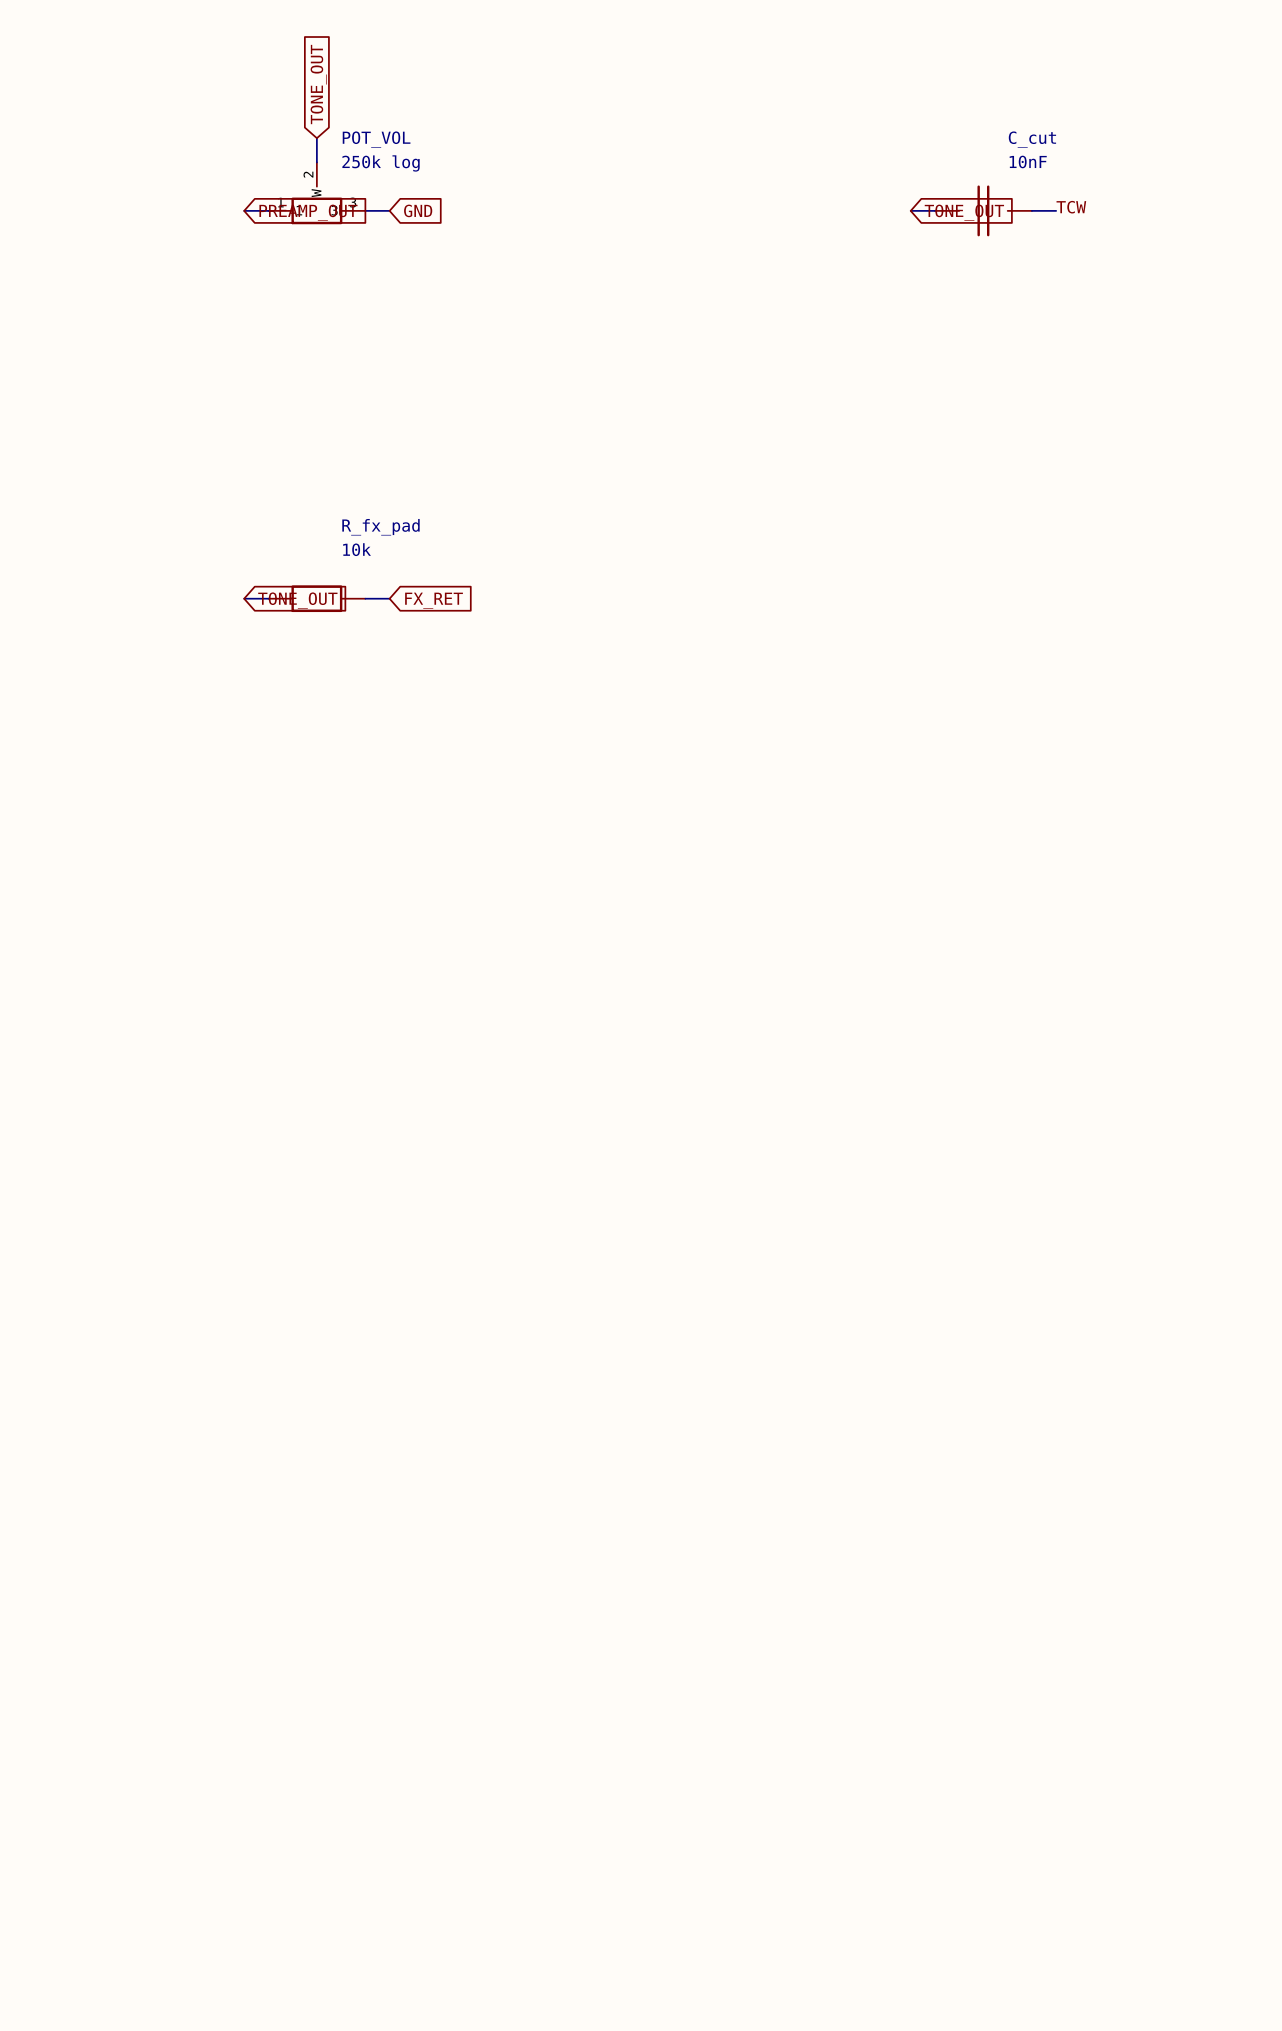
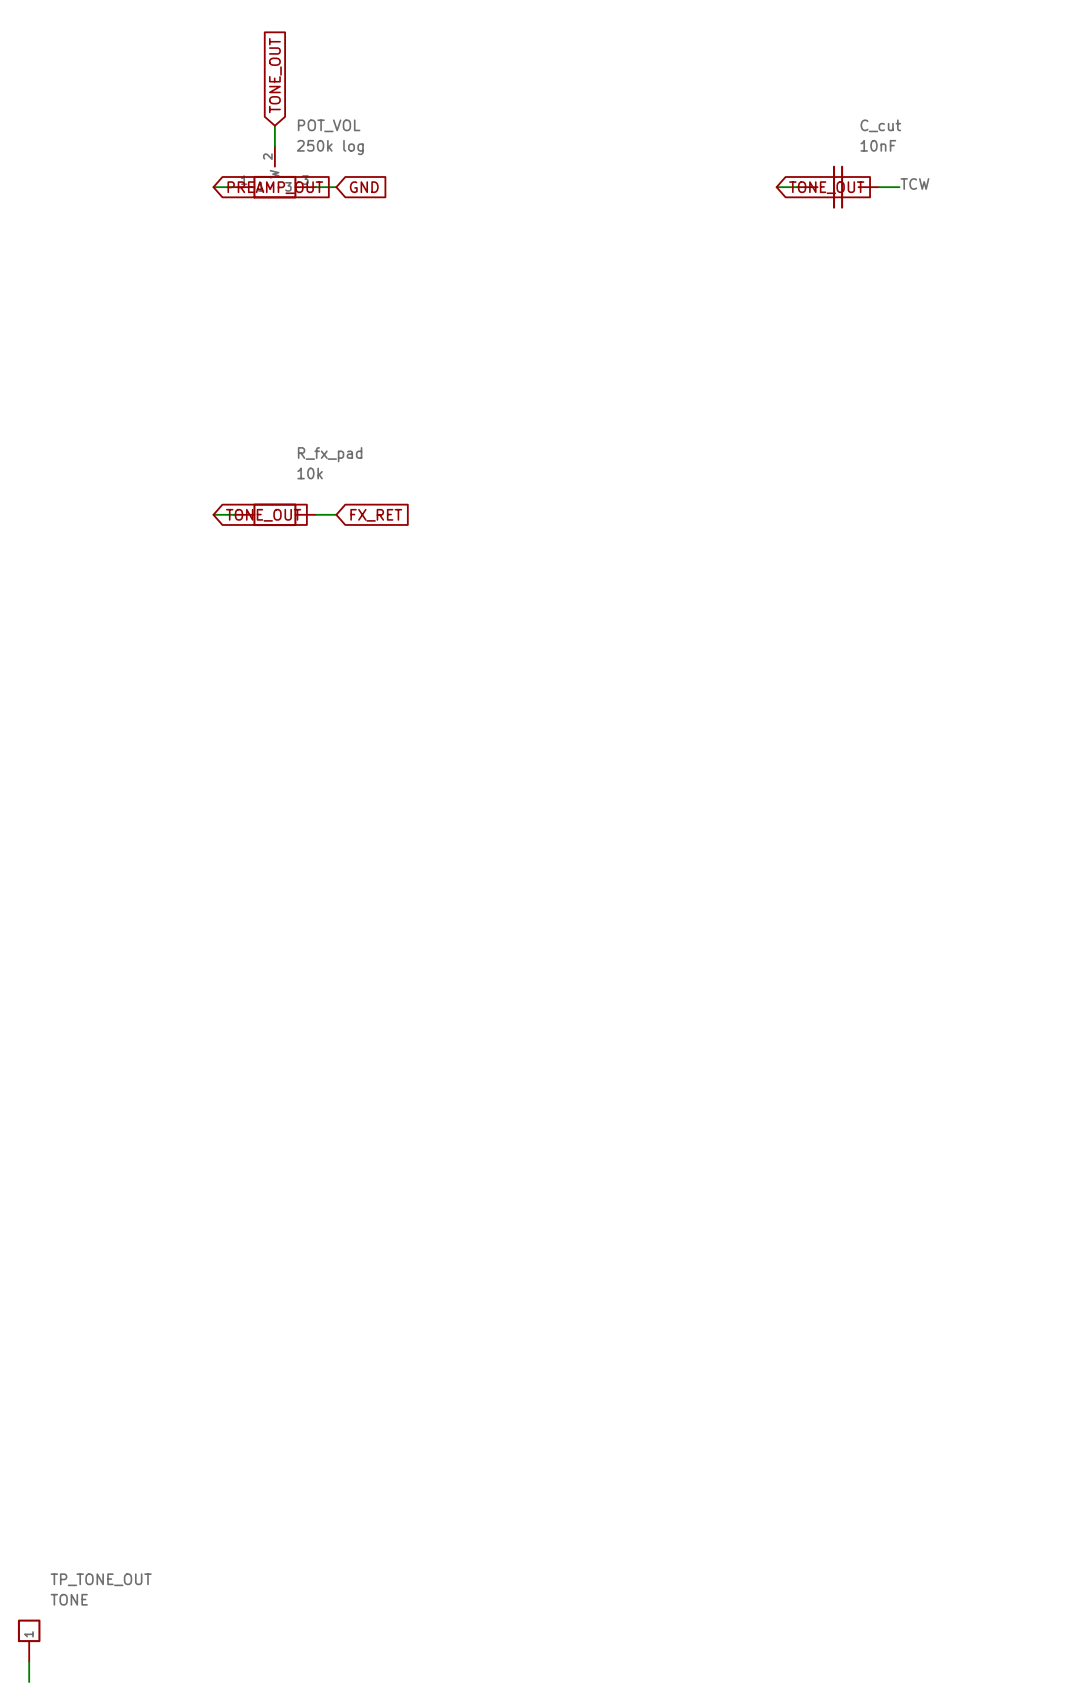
TP_TONE_OUT: none -> TONE (29, 1640)
wire: none -> (29, 1661) (29, 1682)

